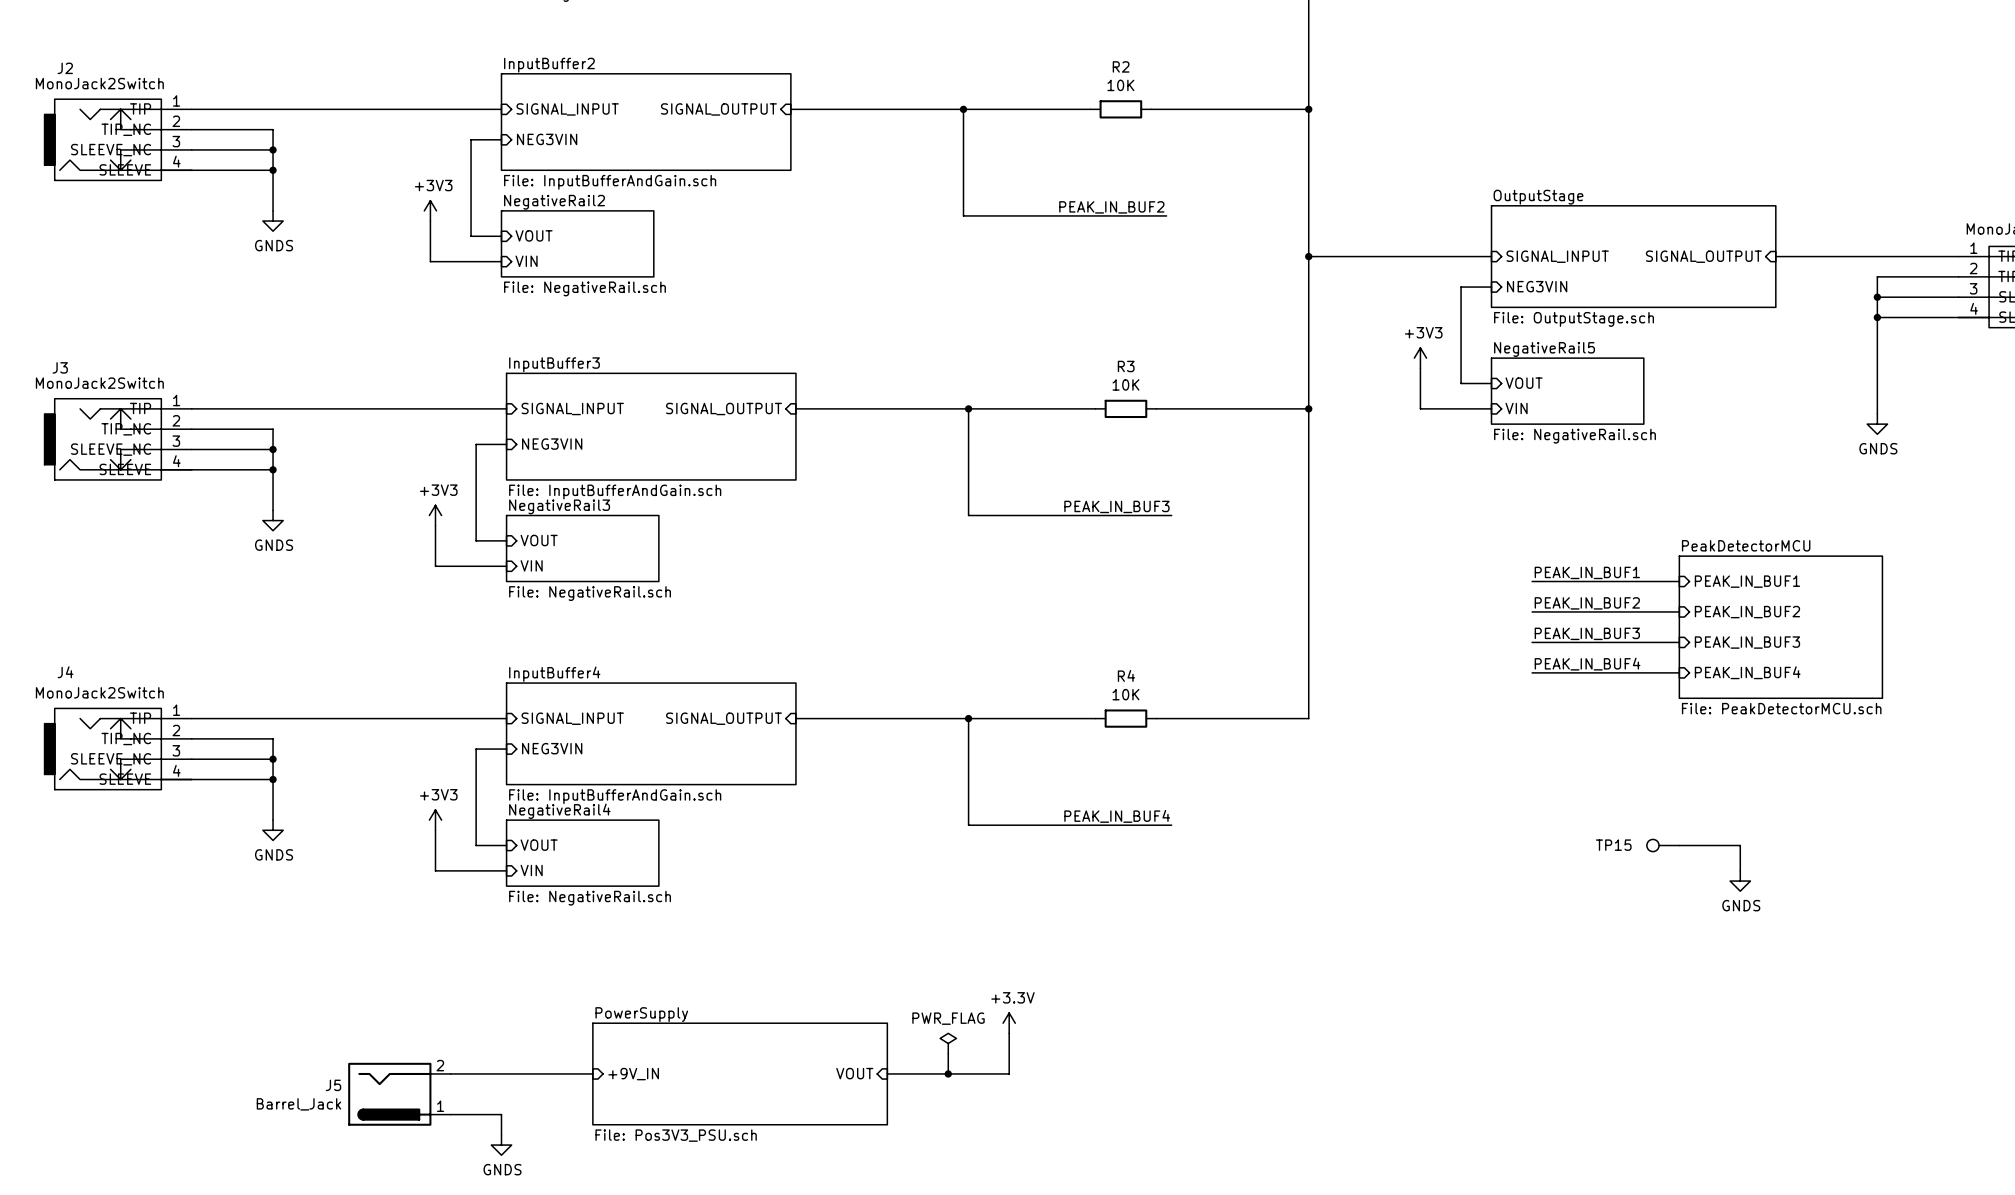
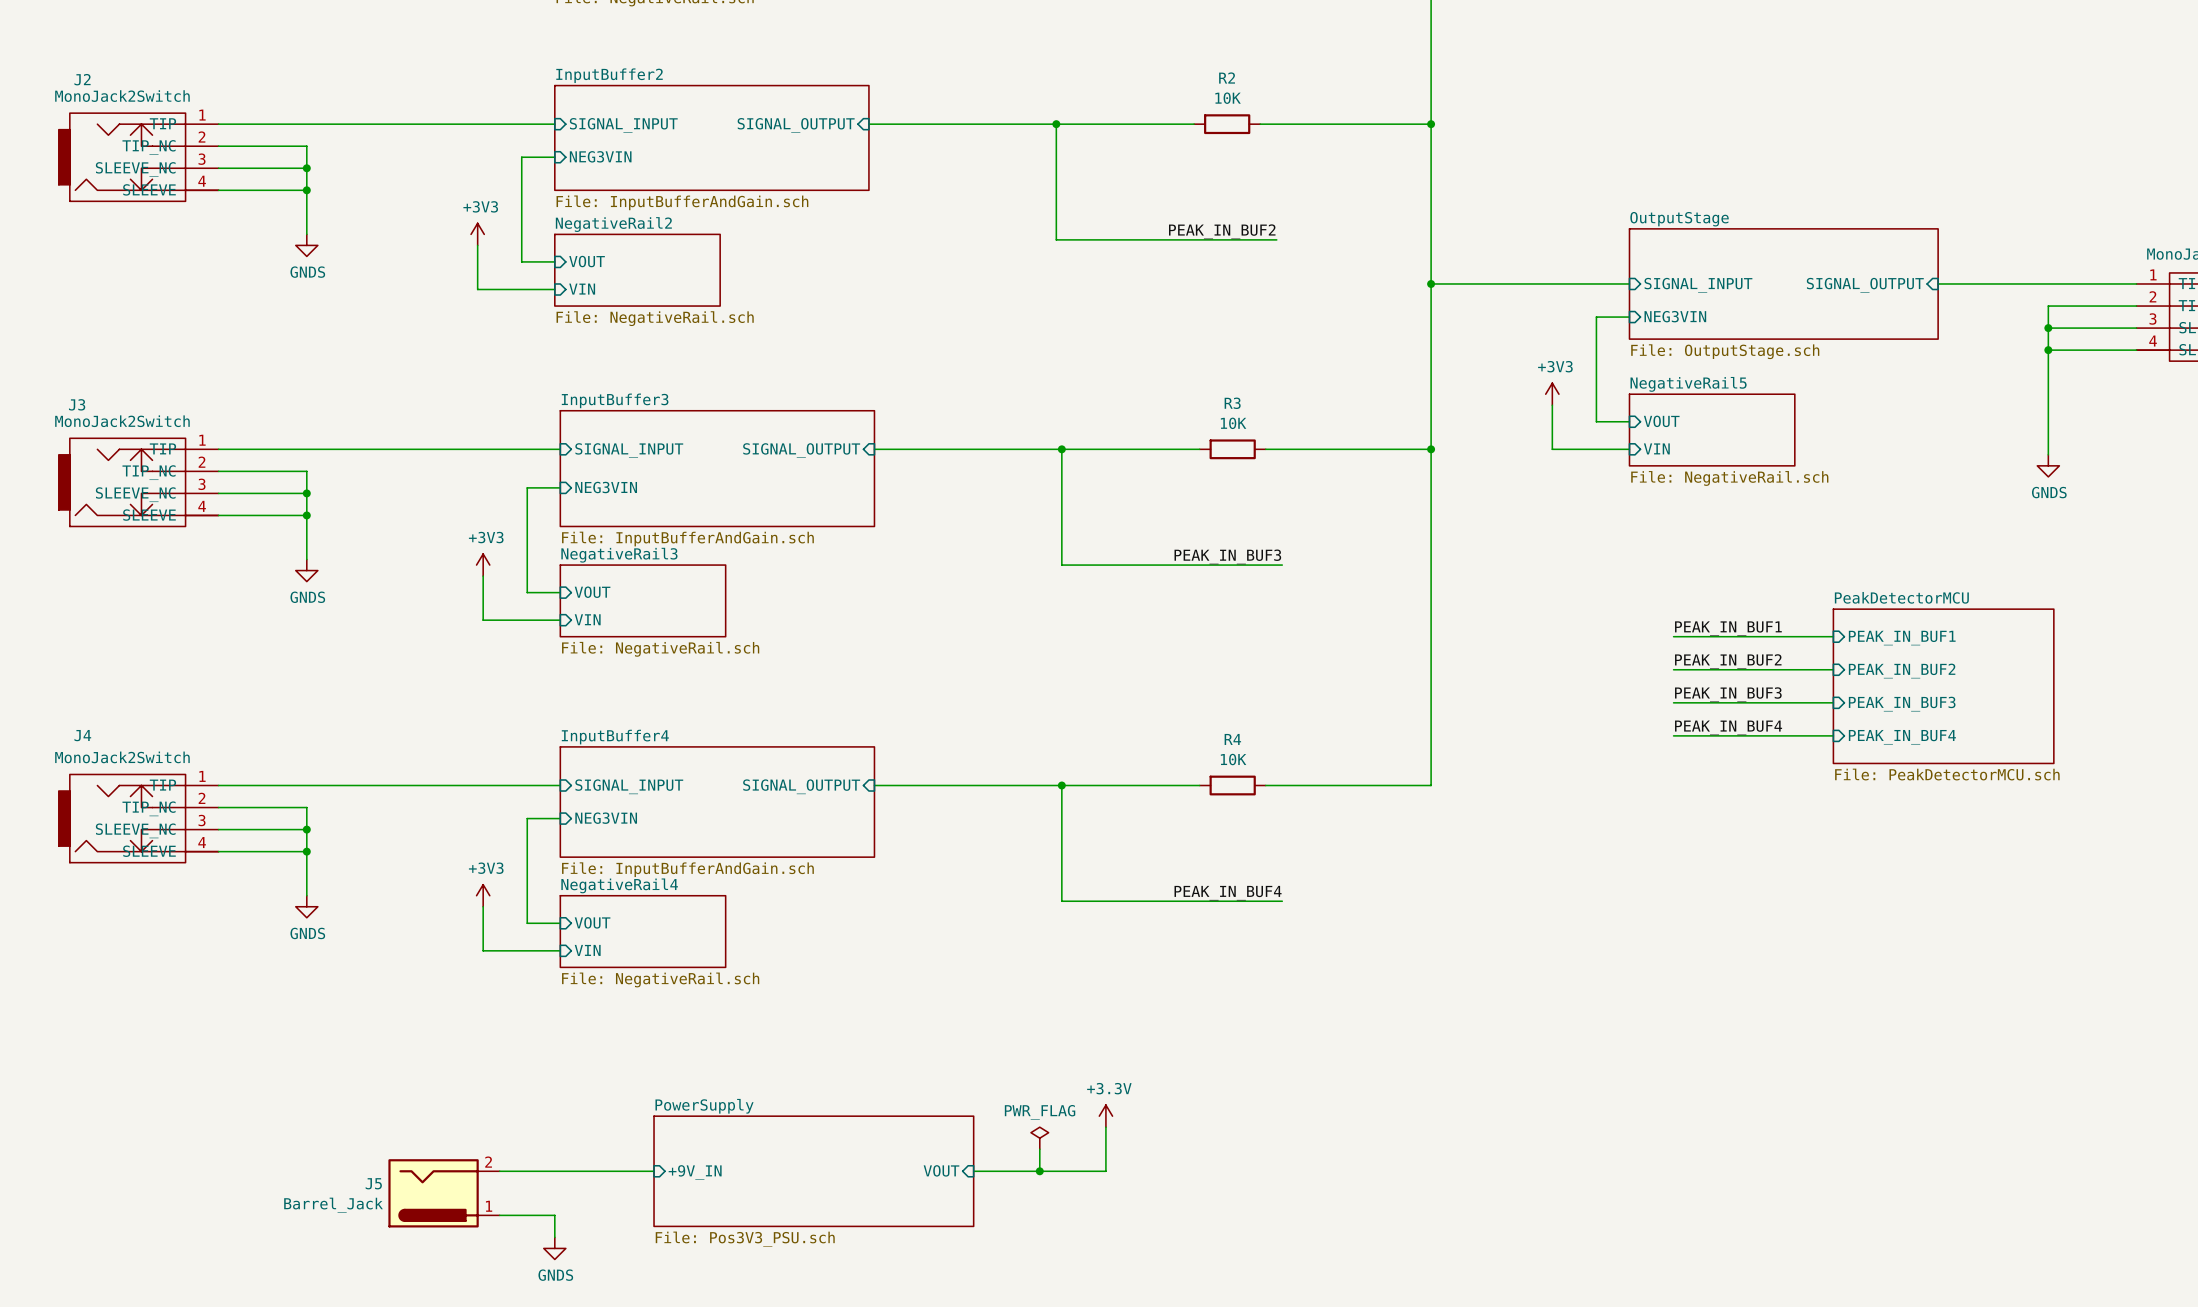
TP15: (1663, 845) -> none
wire: (1679, 845) (1740, 845) (1740, 870) -> none
power symbol: GNDS (1740, 881) -> none

